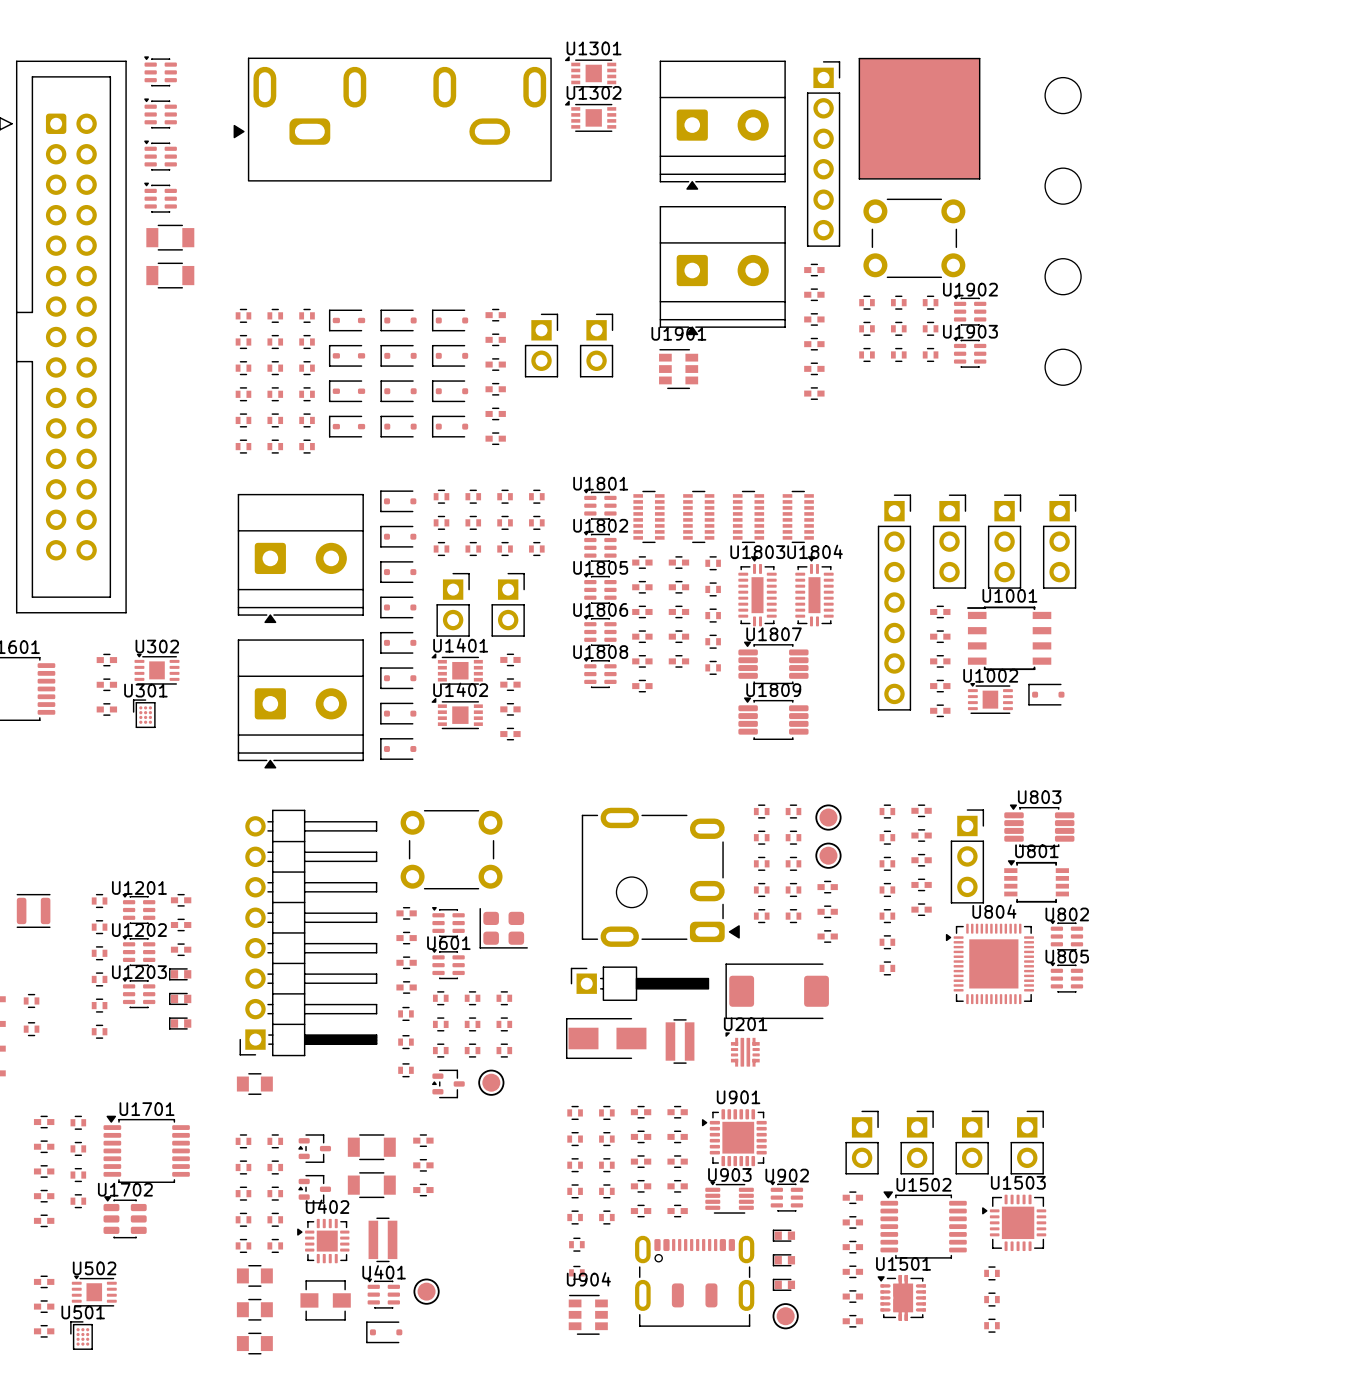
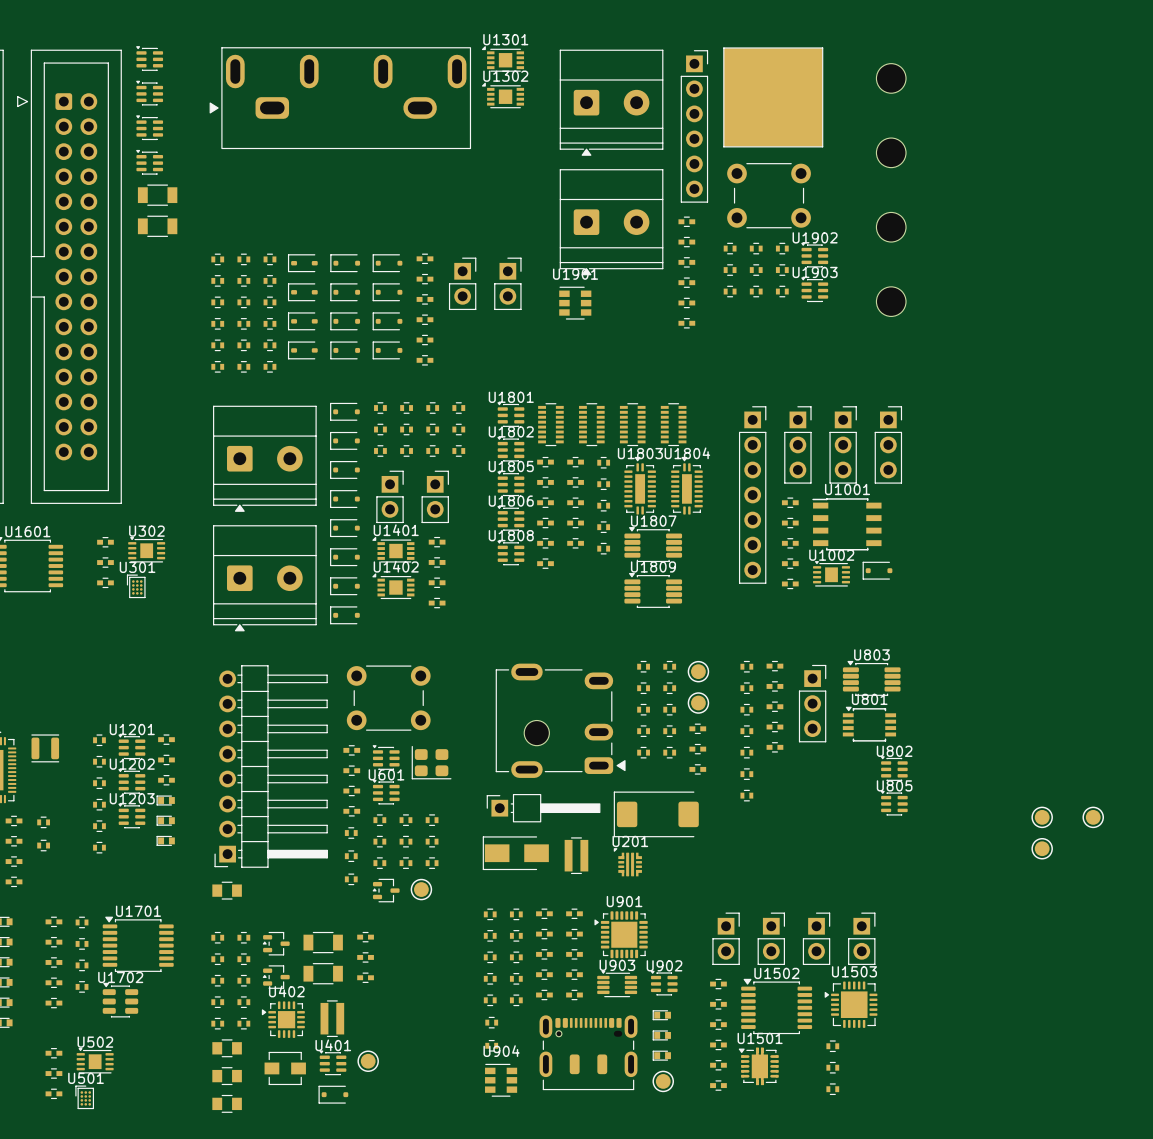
U804: (989, 963) -> none
part: none -> (1042, 817)
part: none -> (1093, 817)
part: none -> (1042, 848)

